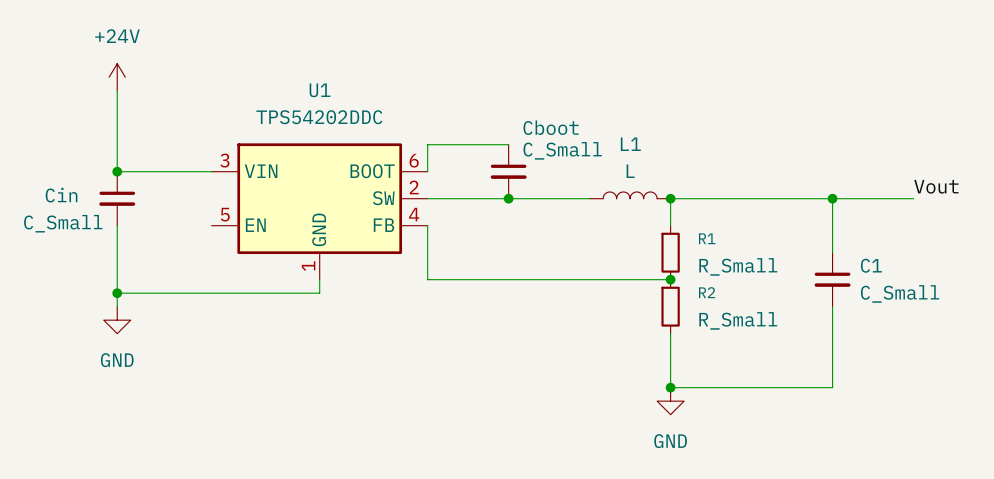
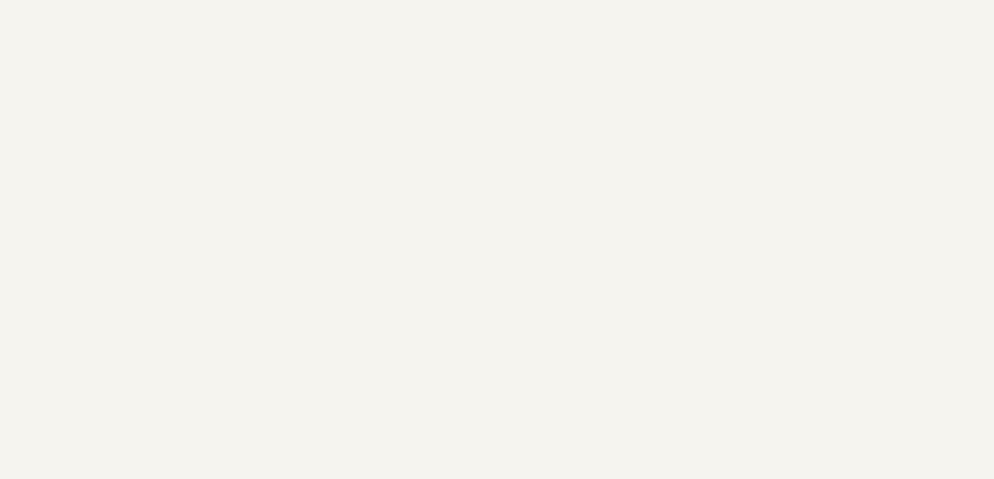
power symbol: +24V (117, 77) -> none
wire: (117, 90) (117, 171) (211, 171) -> none
wire: (508, 144) (427, 144) (427, 171) -> none
junction: (117, 171) -> none
Cboot: C_Small (508, 171) -> none
label: Vout (936, 186) -> none
L1: L (630, 195) -> none
Cin: C_Small (117, 198) -> none
wire: (427, 198) (589, 198) -> none
junction: (508, 198) -> none
junction: (670, 198) -> none
wire: (832, 198) (832, 252) -> none
junction: (832, 198) -> none
wire: (913, 198) (670, 198) (670, 225) -> none
U1: TPS54202DDC (319, 211) -> none
wire: (117, 225) (117, 306) -> none
wire: (427, 225) (427, 279) (670, 279) -> none
R1: R_Small (670, 252) -> none
wire: (319, 279) (319, 293) (117, 293) -> none
junction: (670, 279) -> none
C1: C_Small (832, 279) -> none
junction: (117, 293) -> none
R2: R_Small (670, 306) -> none
wire: (832, 306) (832, 387) (670, 387) (670, 333) -> none
power symbol: GND (117, 320) -> none
junction: (670, 387) -> none
power symbol: GND (670, 401) -> none

